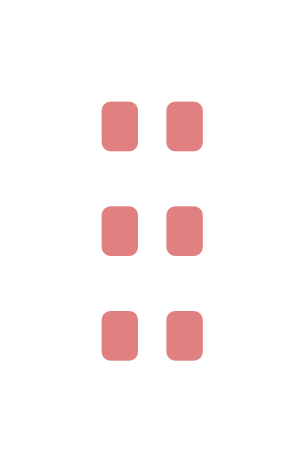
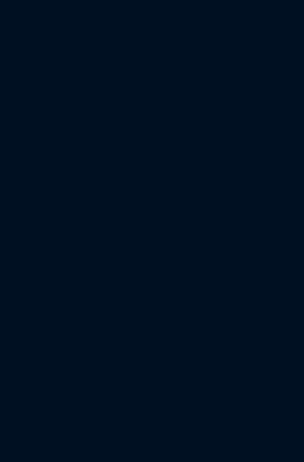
part: (152, 126) -> none
part: (152, 231) -> none
part: (152, 335) -> none

